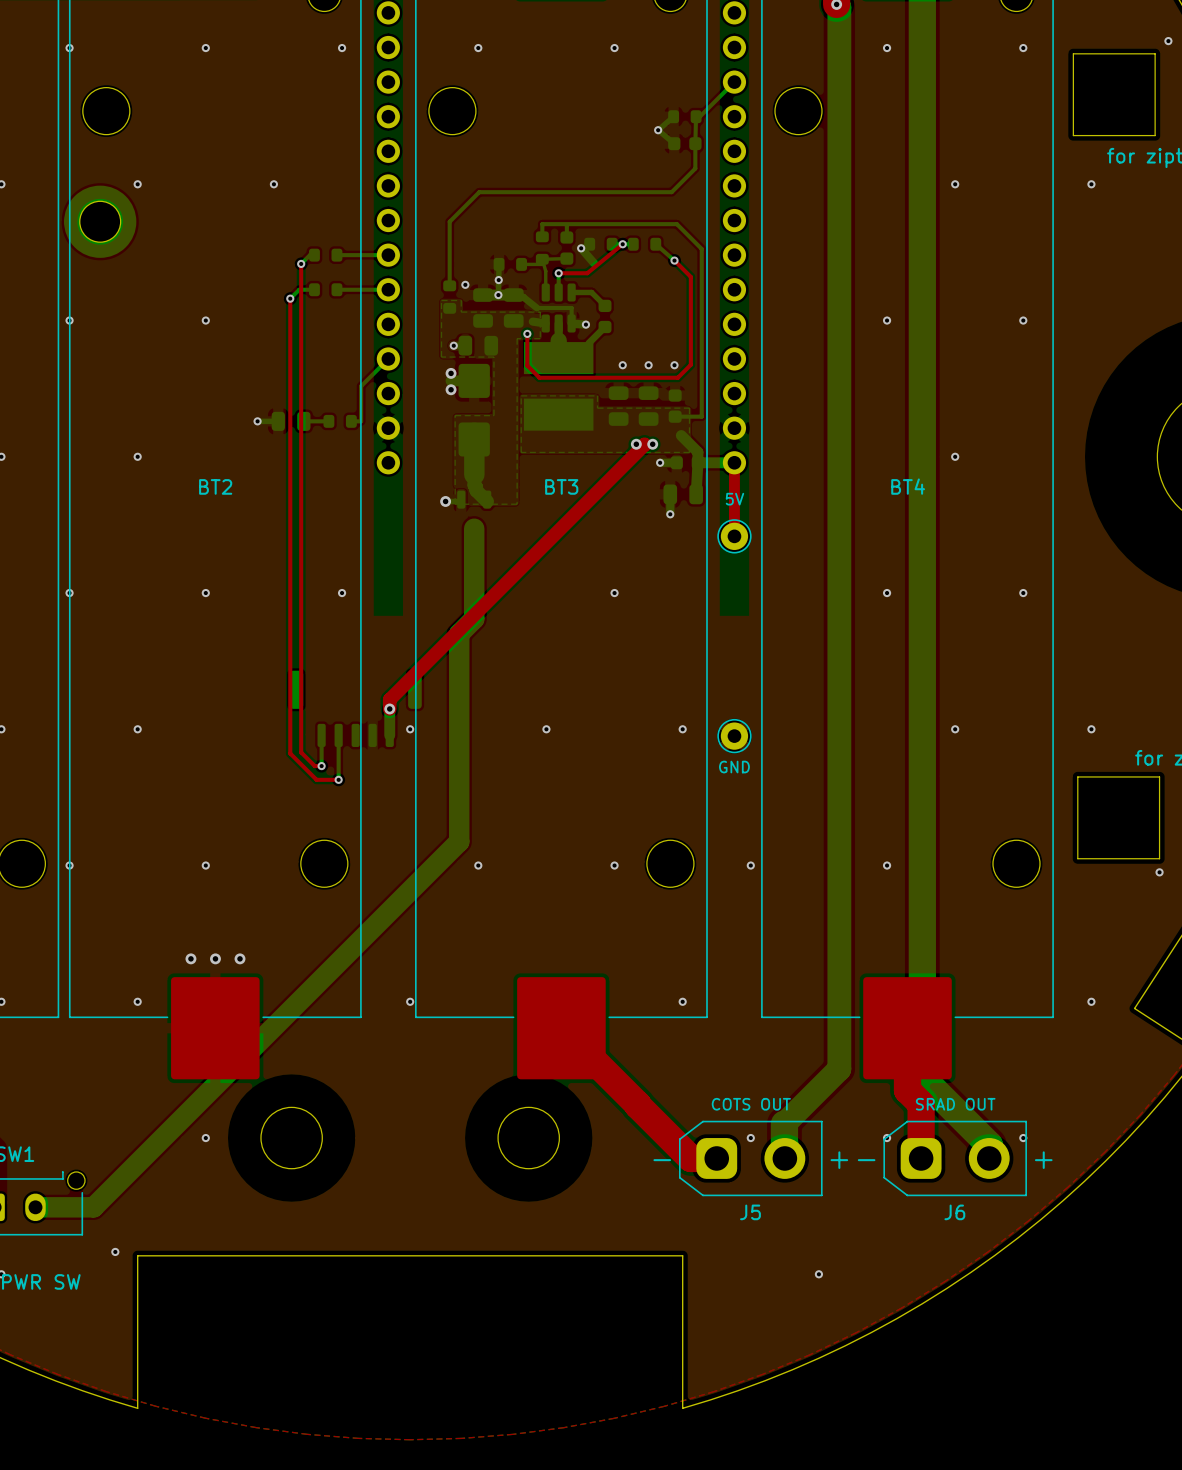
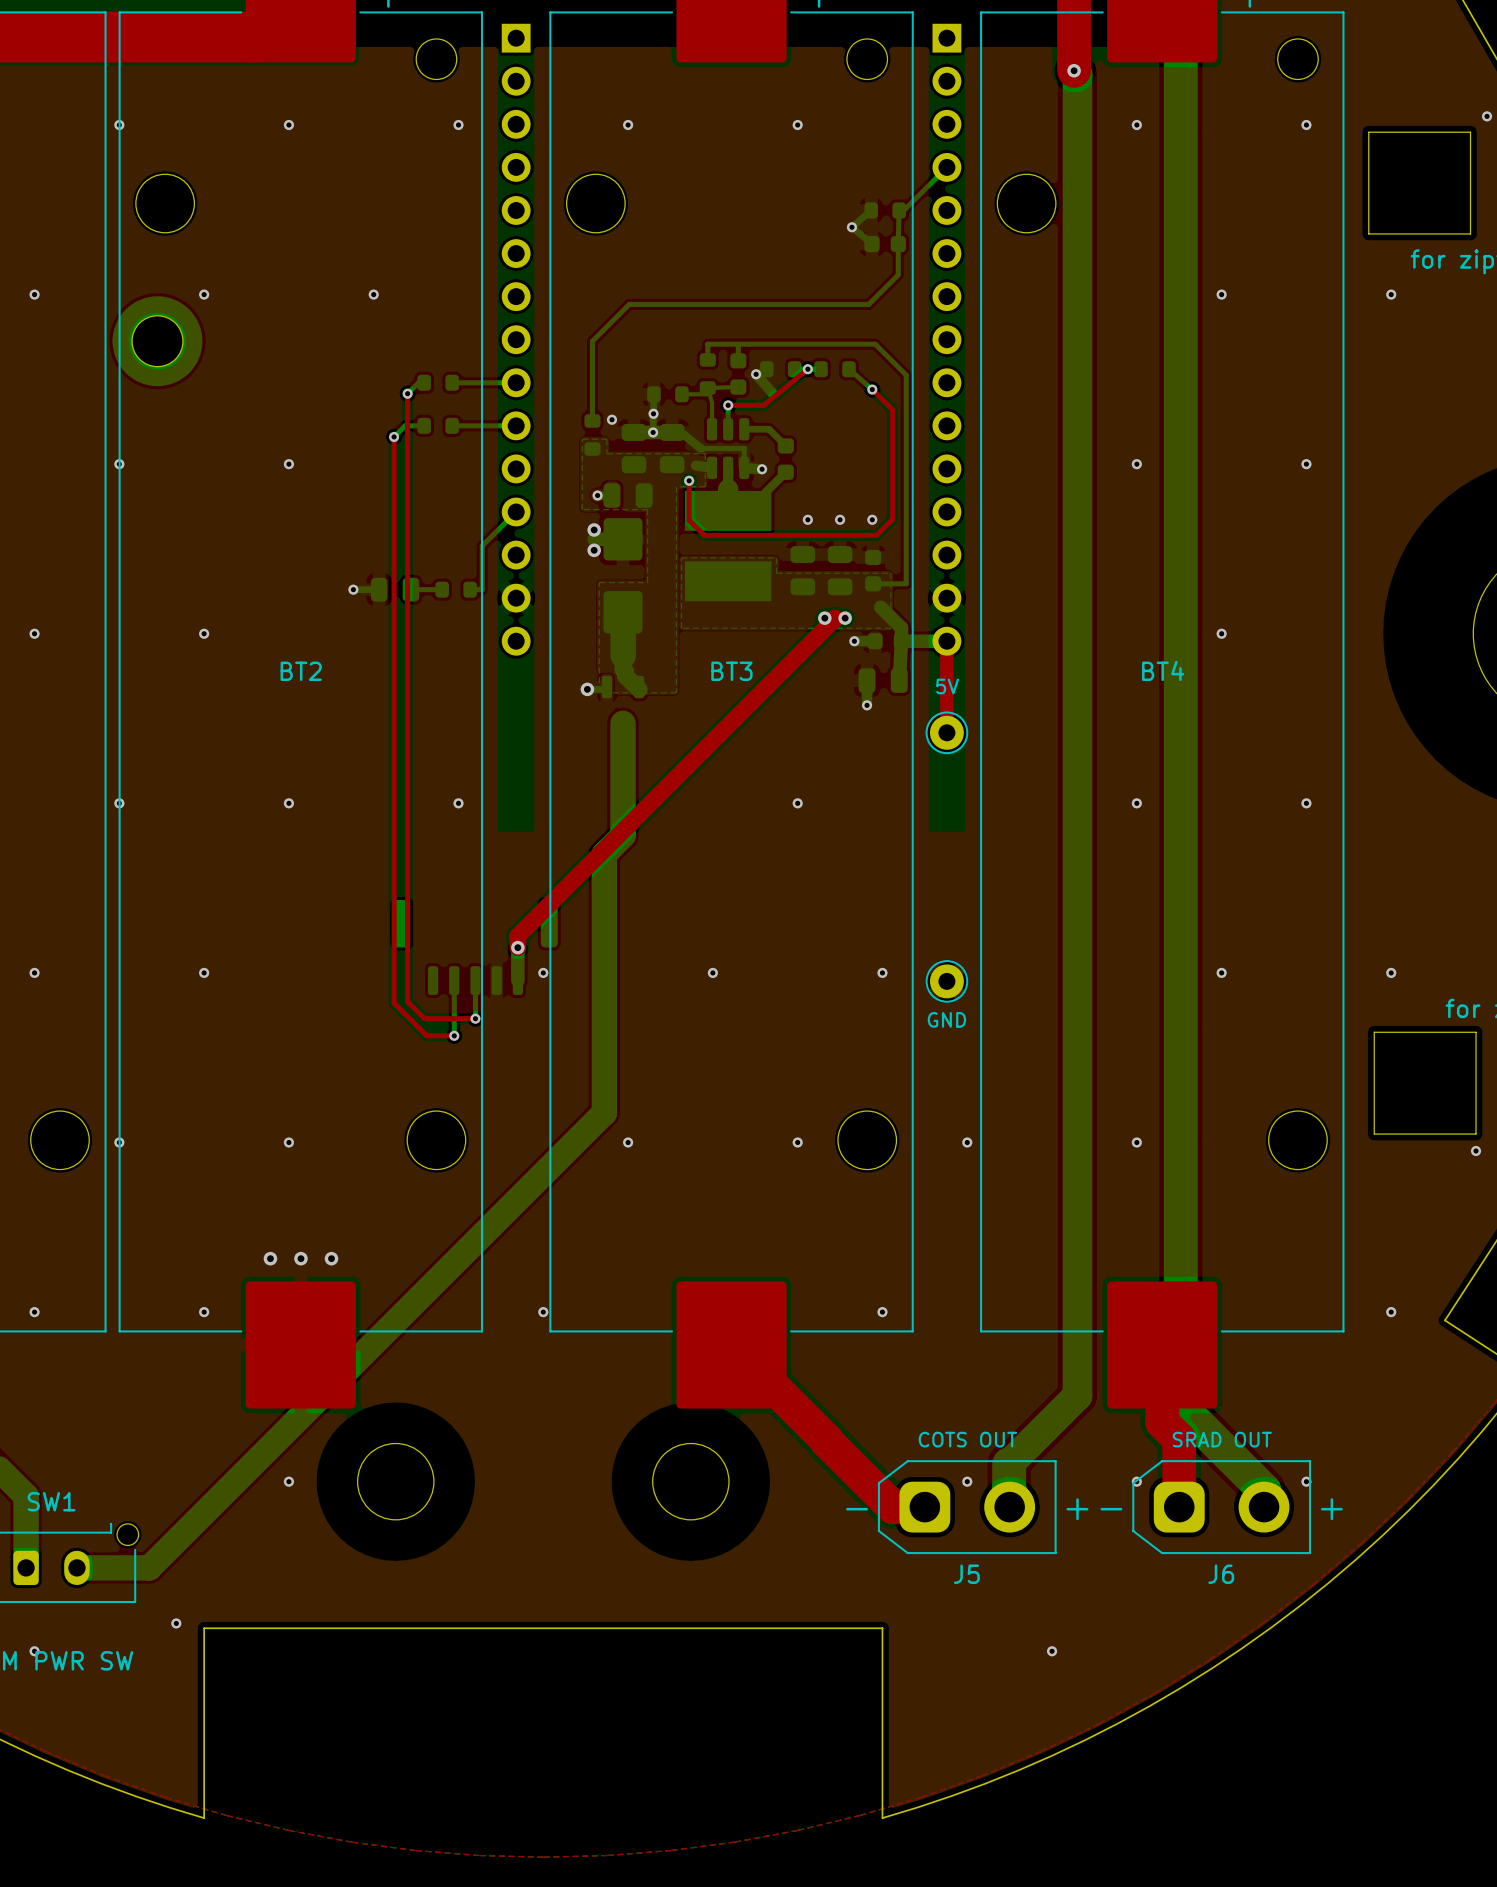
bottom track: (321, 735) (321, 766) -> (475, 980) (475, 1018)
top track: none -> (433, 1018) (475, 1018)
via position: (321, 766) -> (475, 1018)

